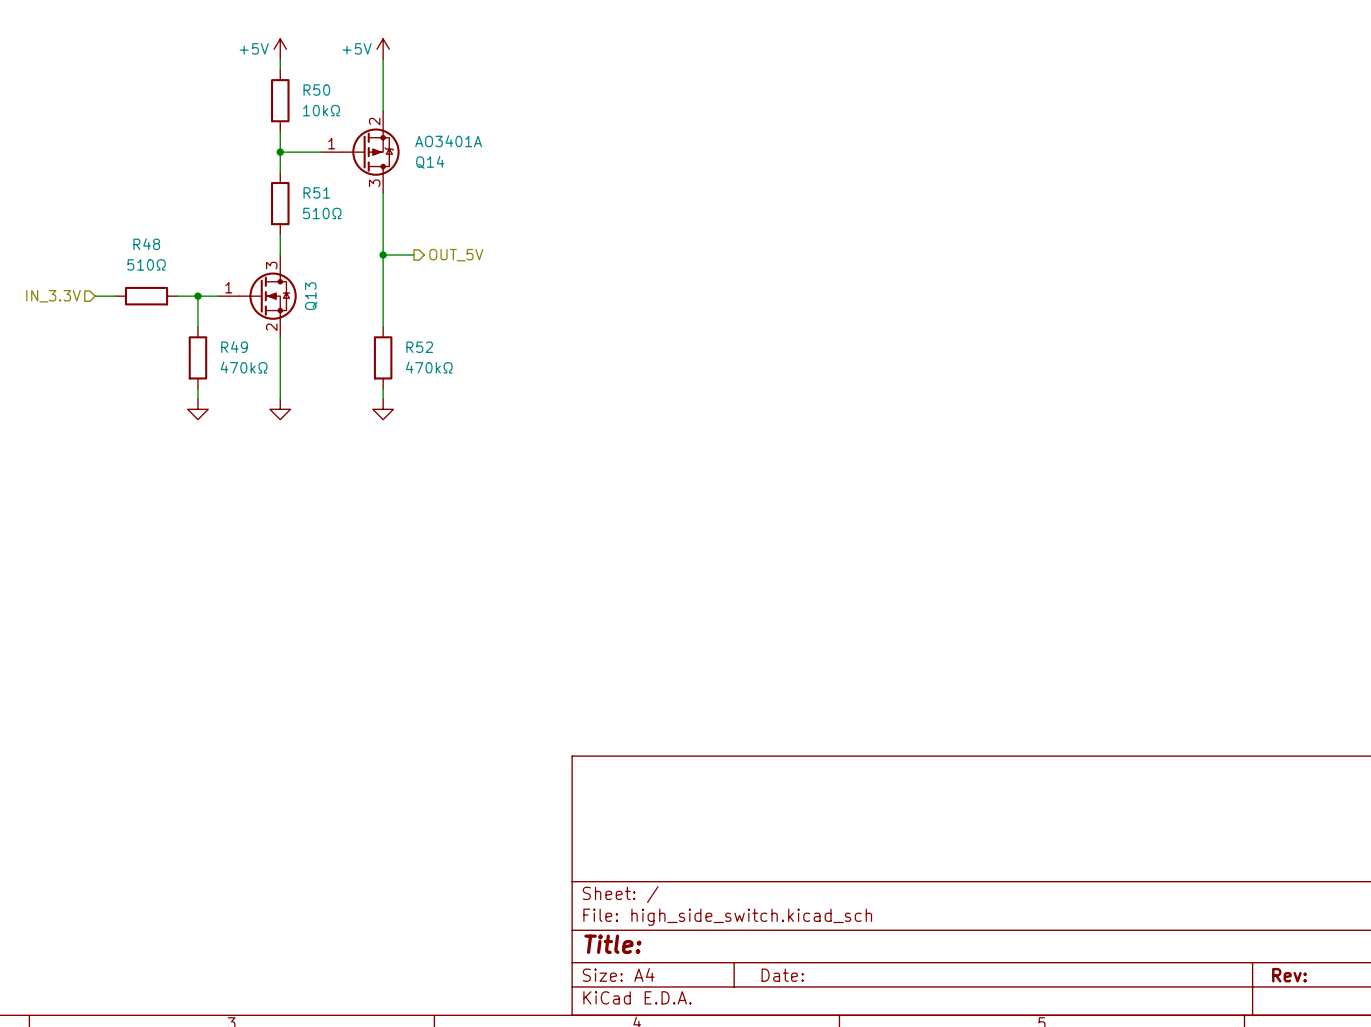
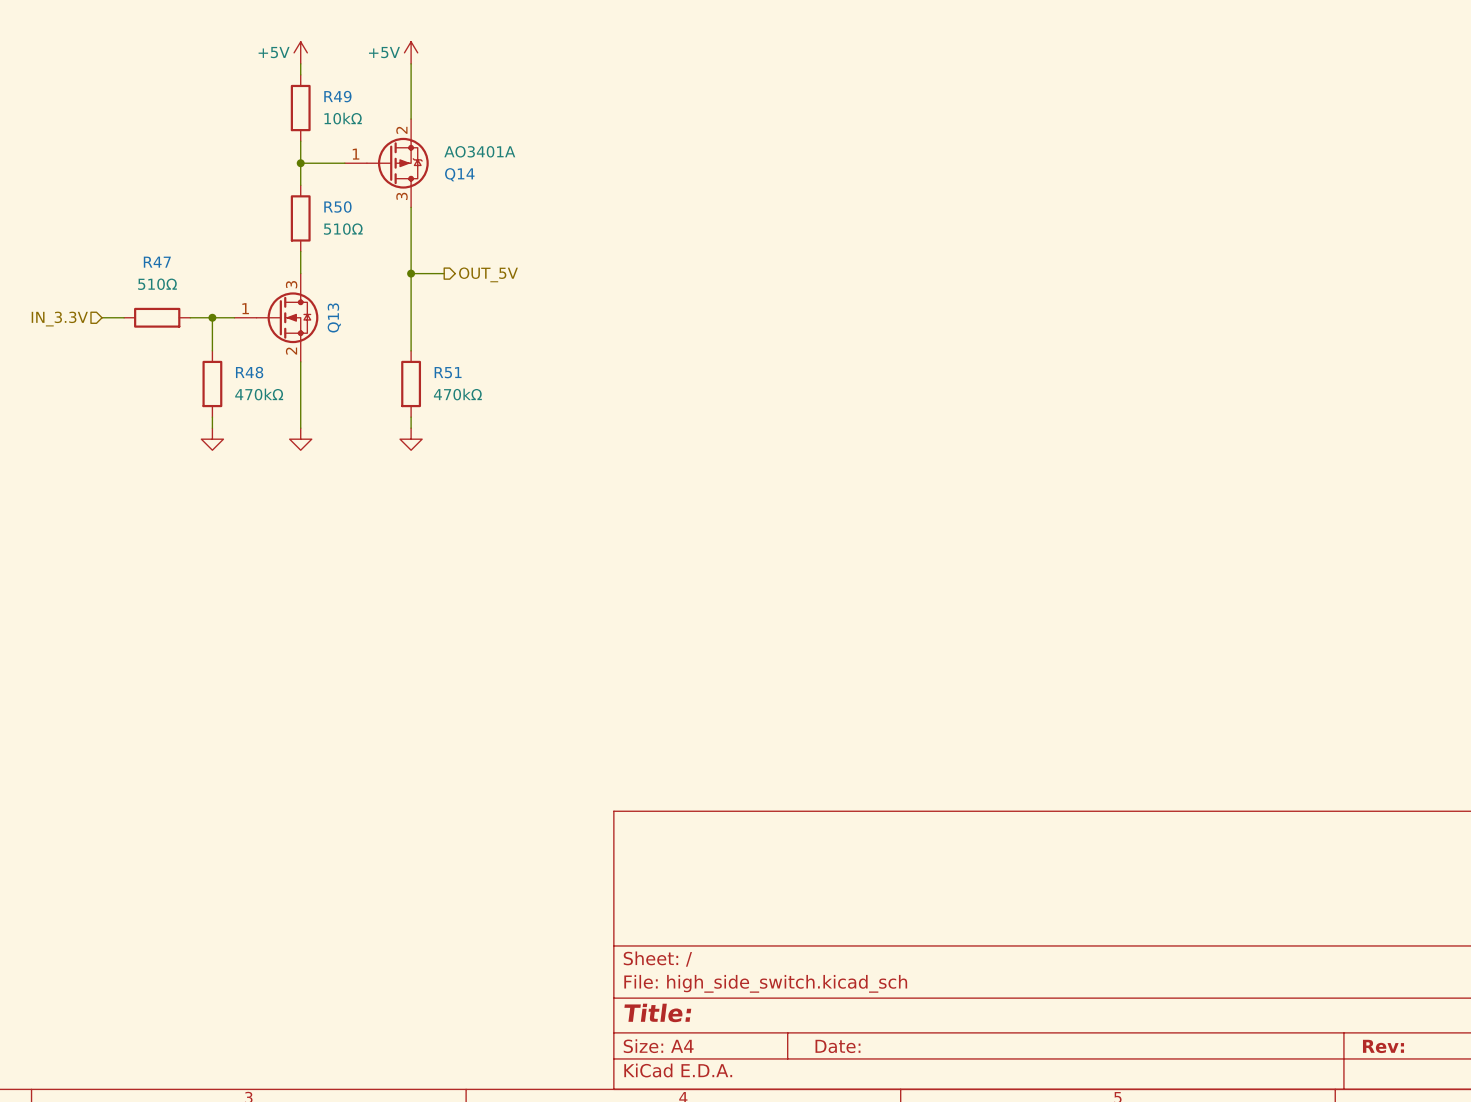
R50 name: R50 (316, 90) -> R49 (337, 96)
R51 name: R51 (316, 192) -> R50 (337, 206)
R48 name: R48 (146, 244) -> R47 (157, 262)
R49 name: R49 (234, 346) -> R48 (249, 372)
R52 name: R52 (419, 347) -> R51 (448, 372)

